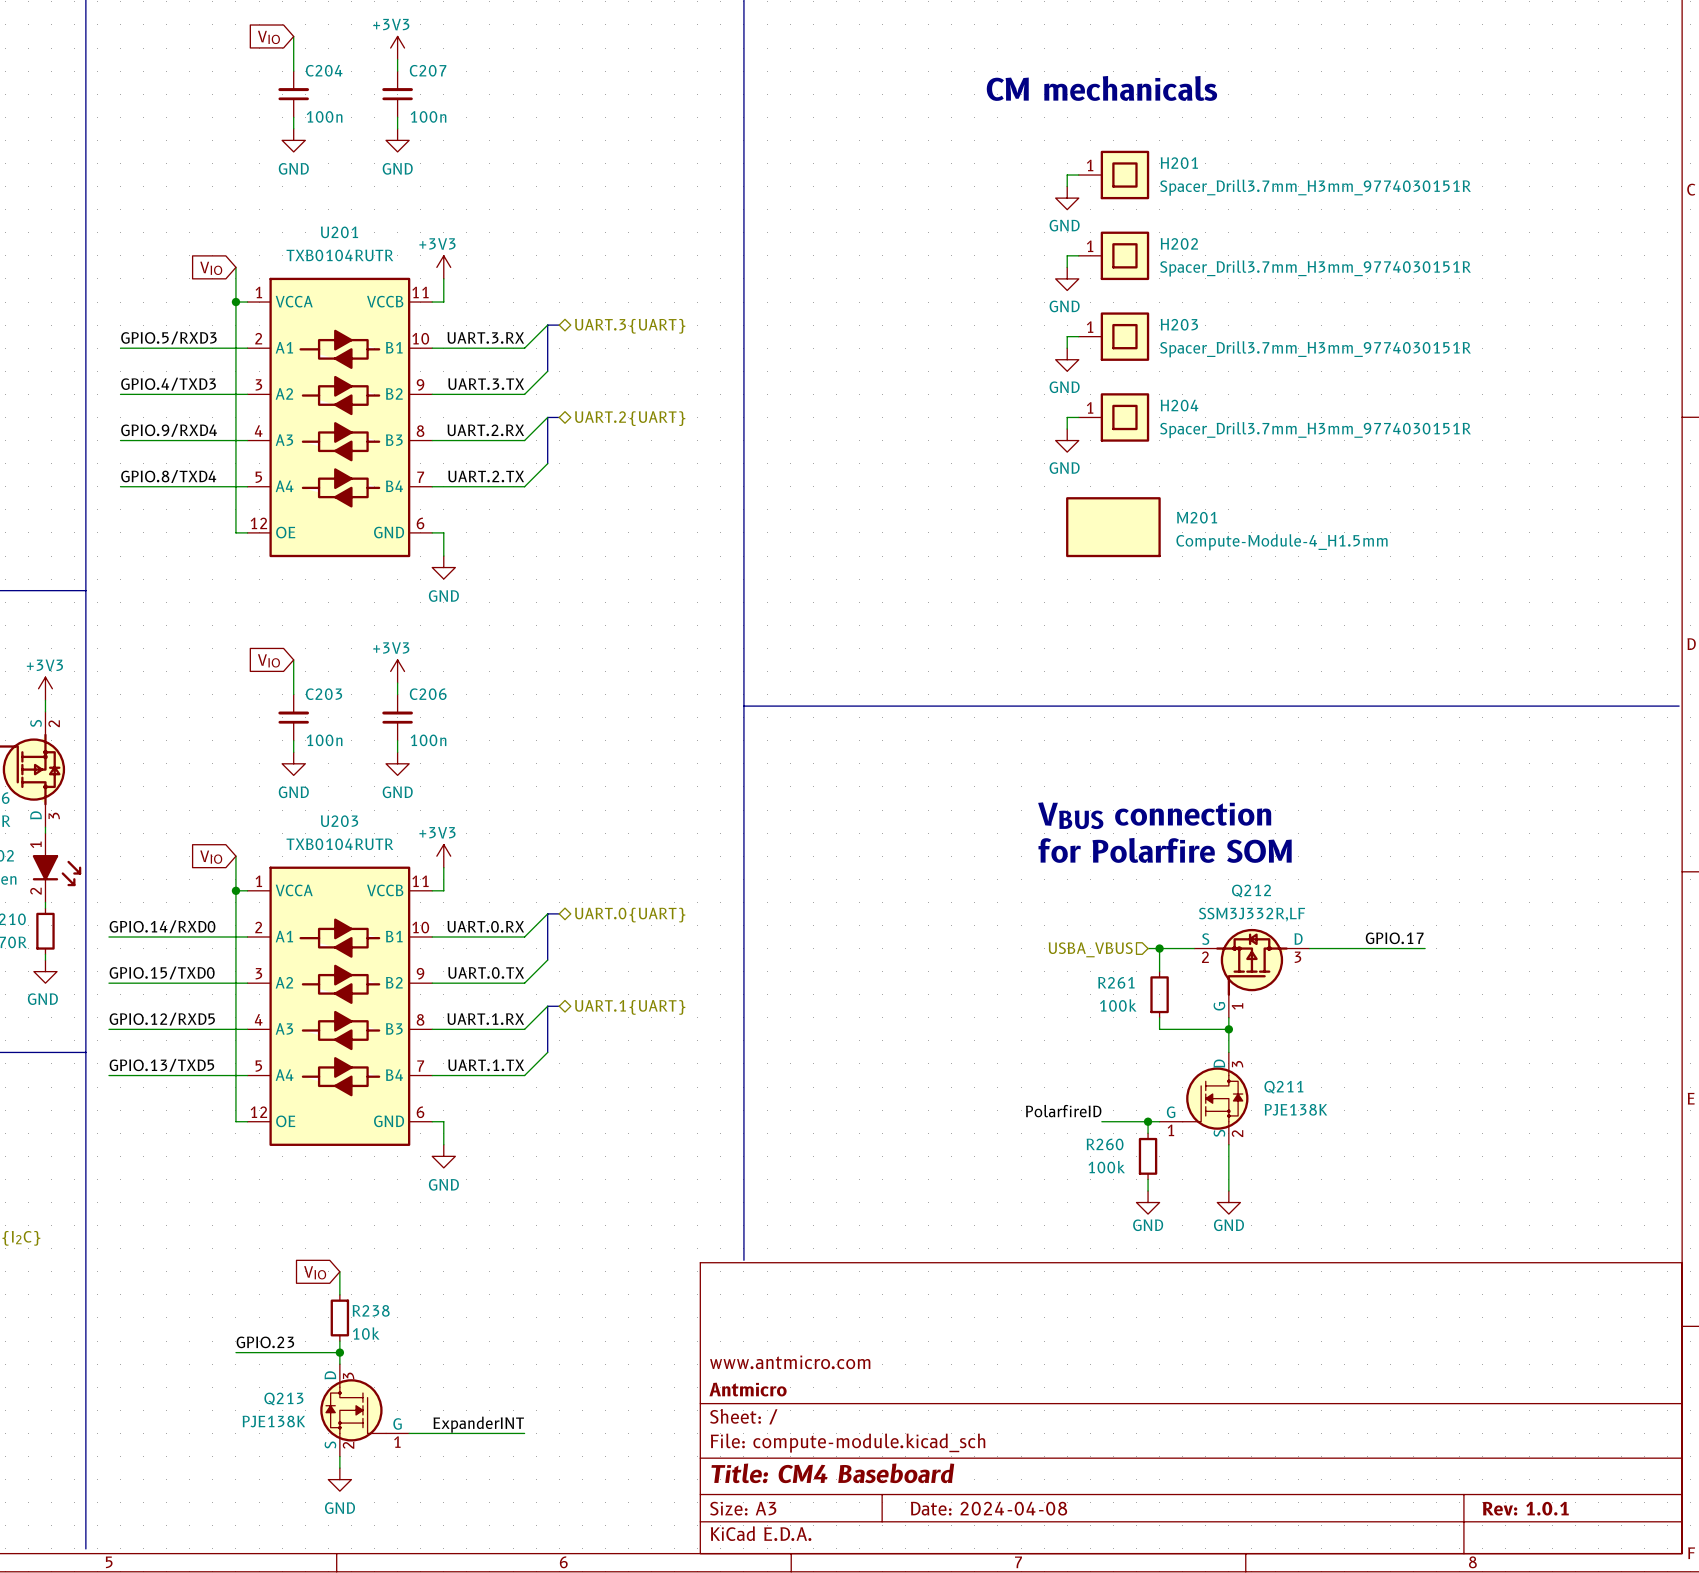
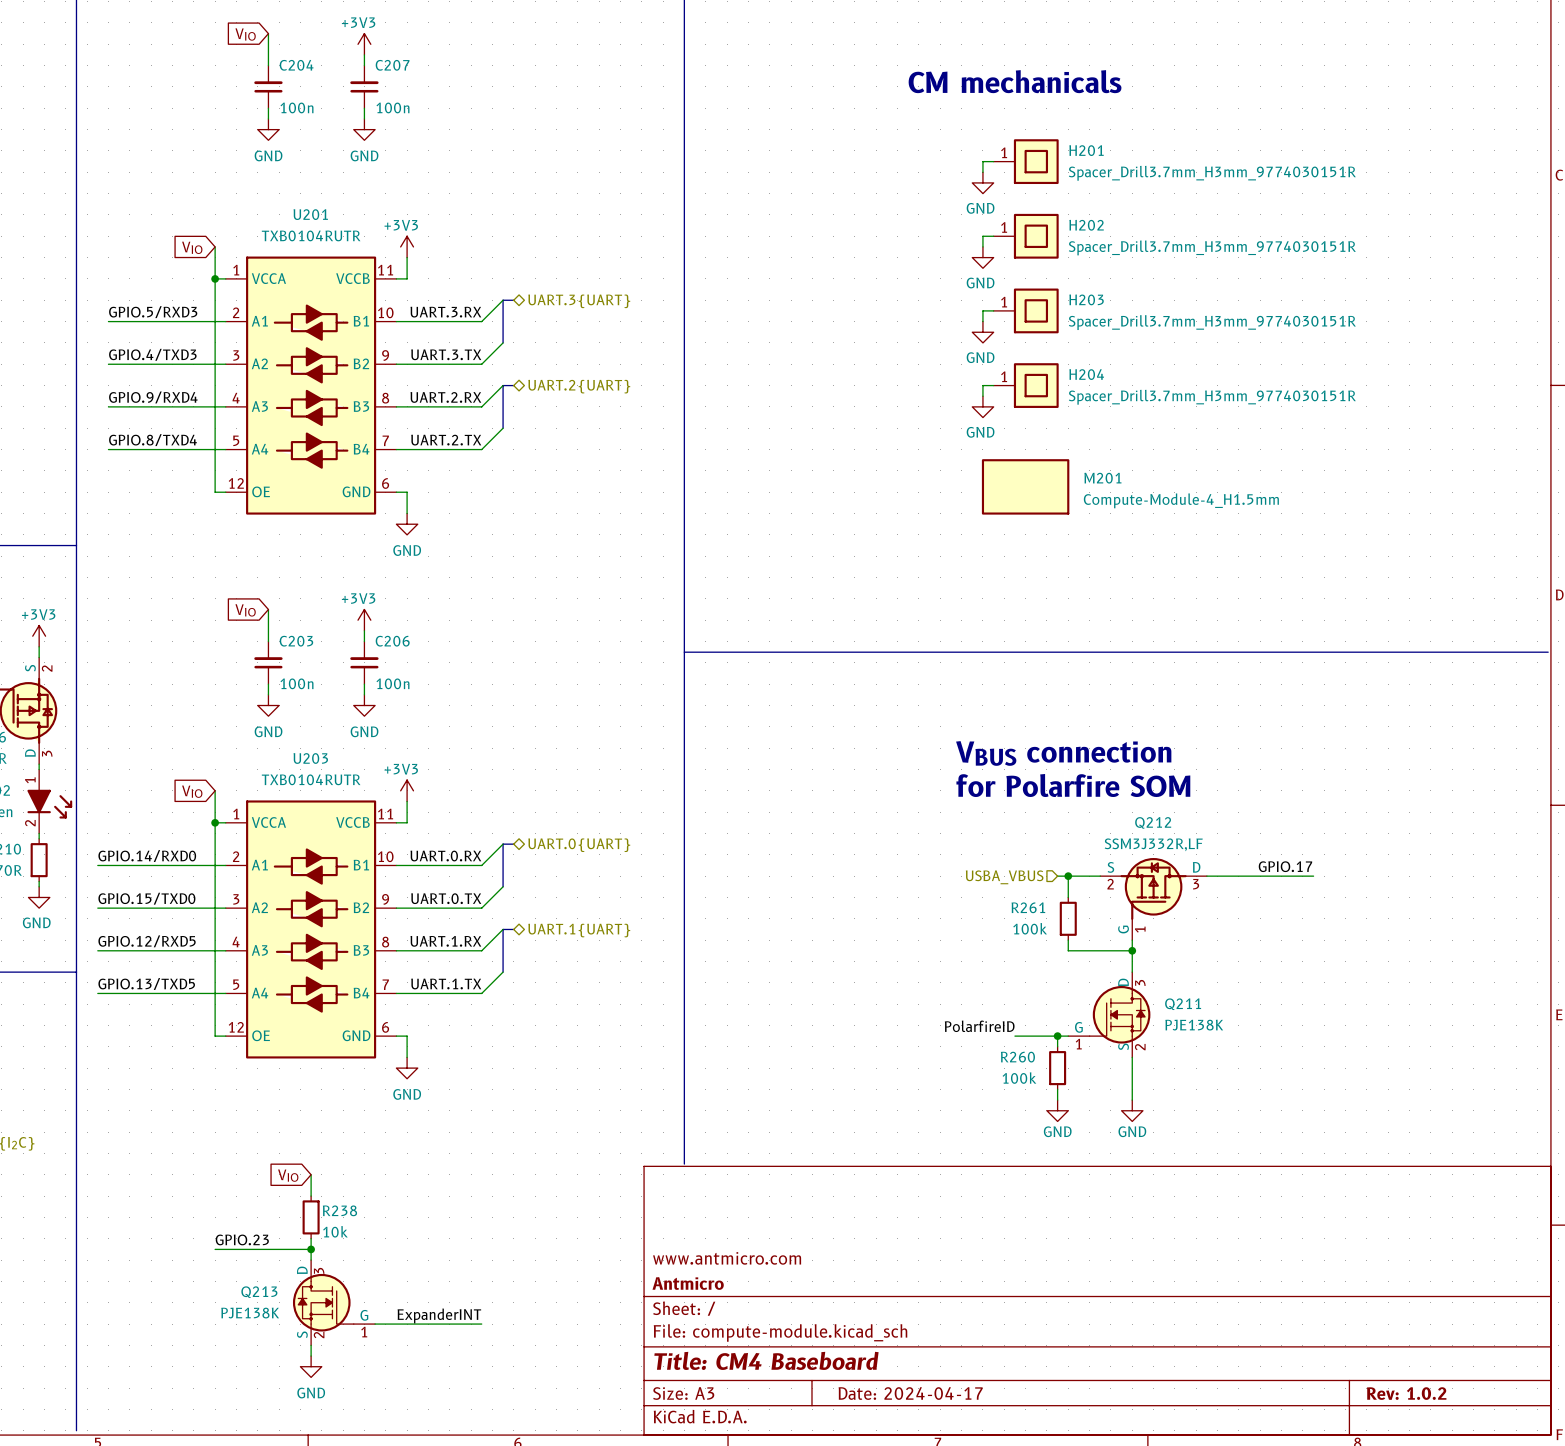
title block: Date: 2024-04-08 (989, 1508) -> Date: 2024-04-17 (910, 1393)
title block: Rev: 1.0.1 (1525, 1508) -> Rev: 1.0.2 (1406, 1393)

